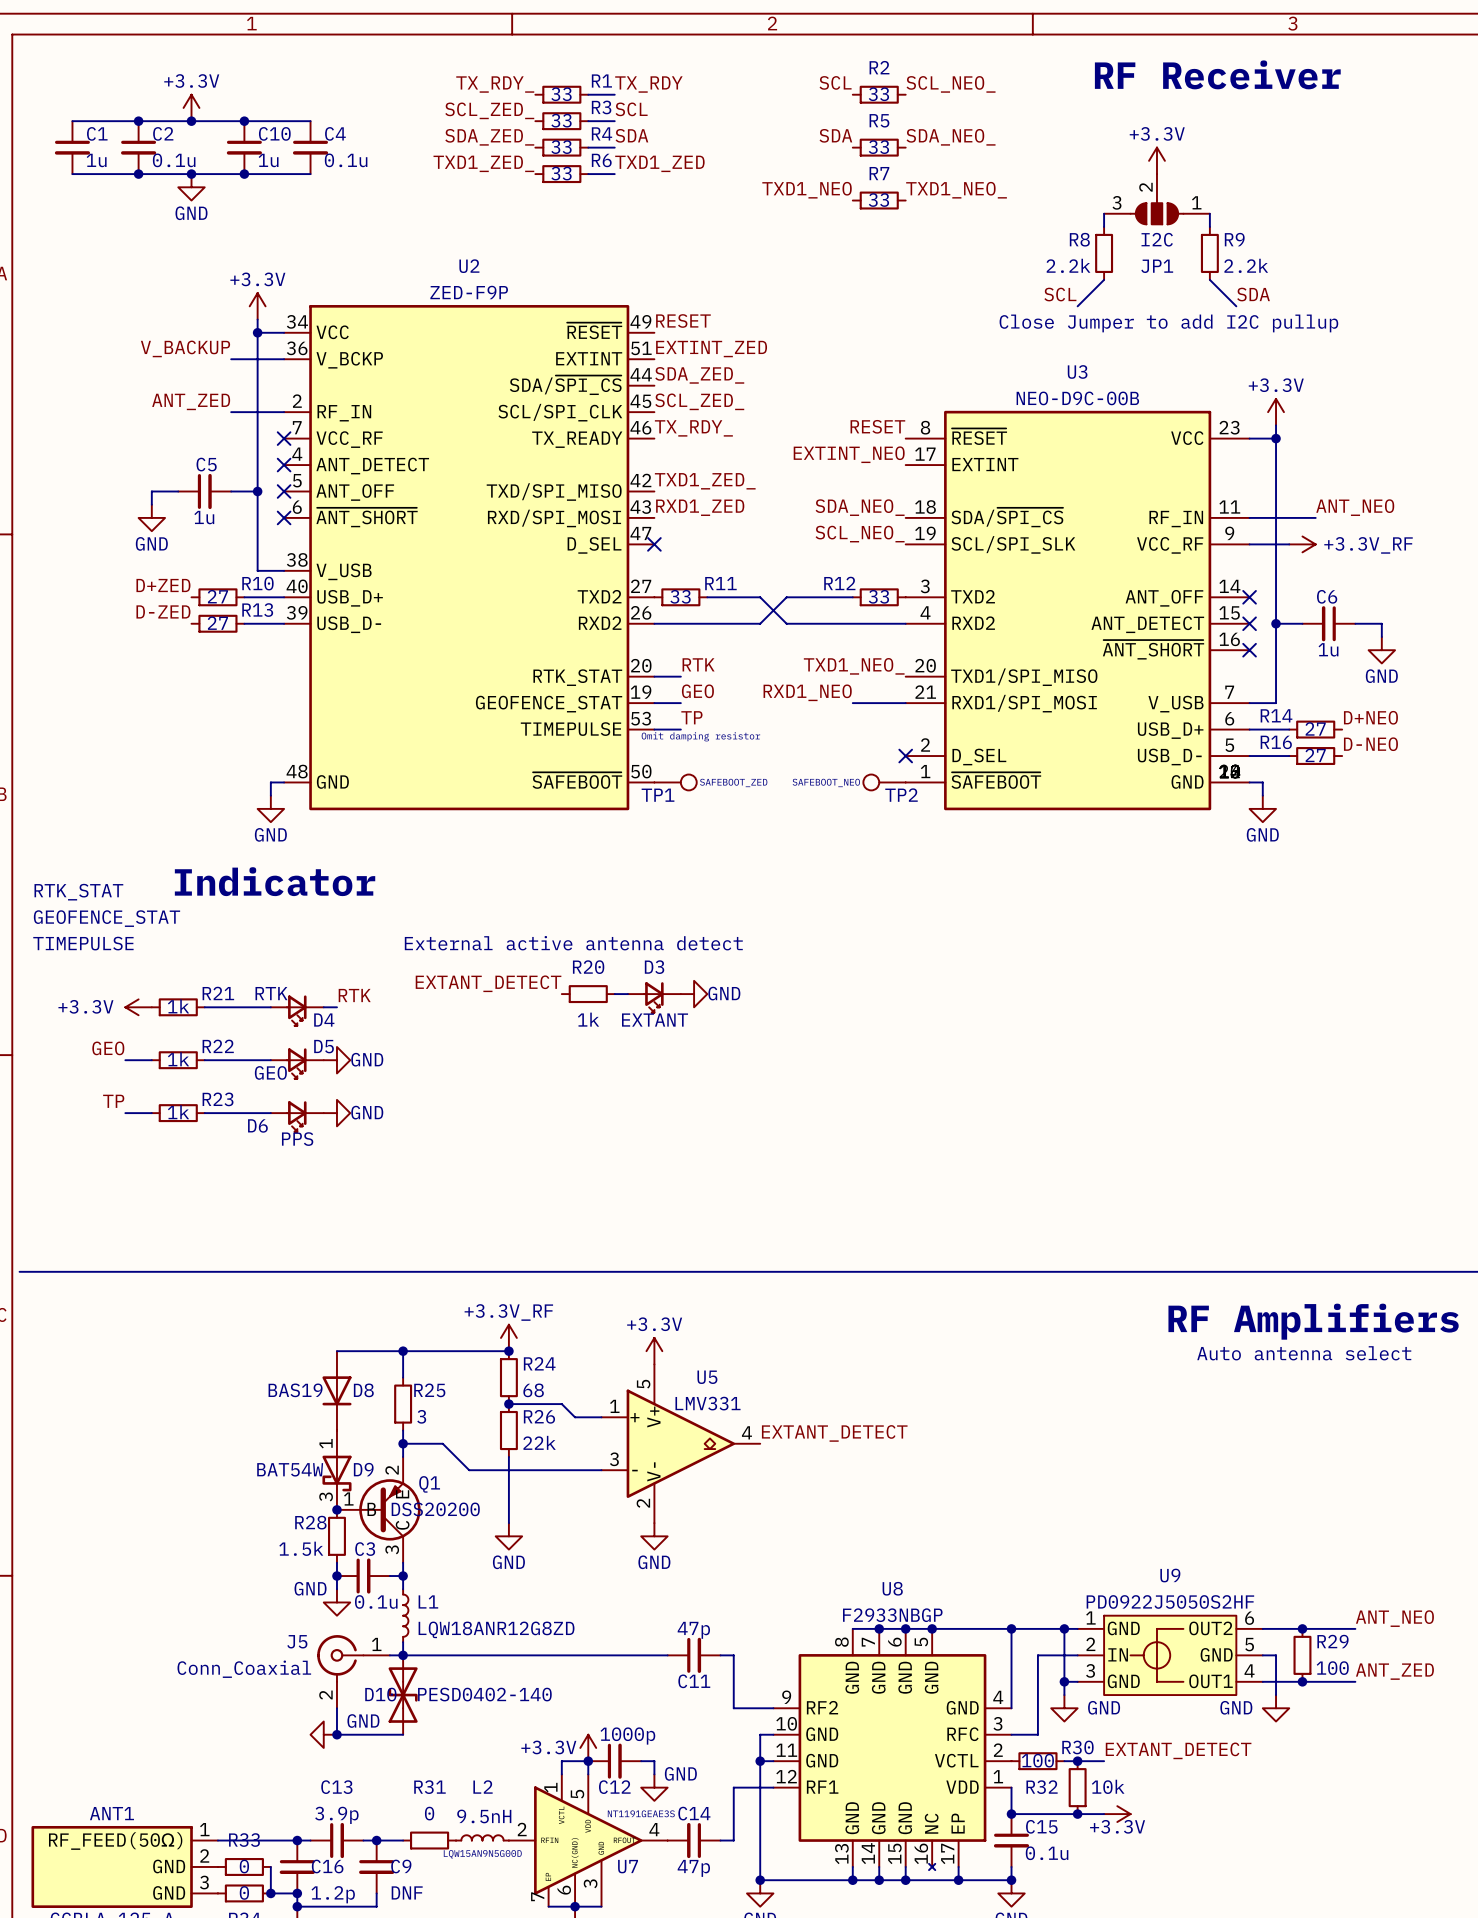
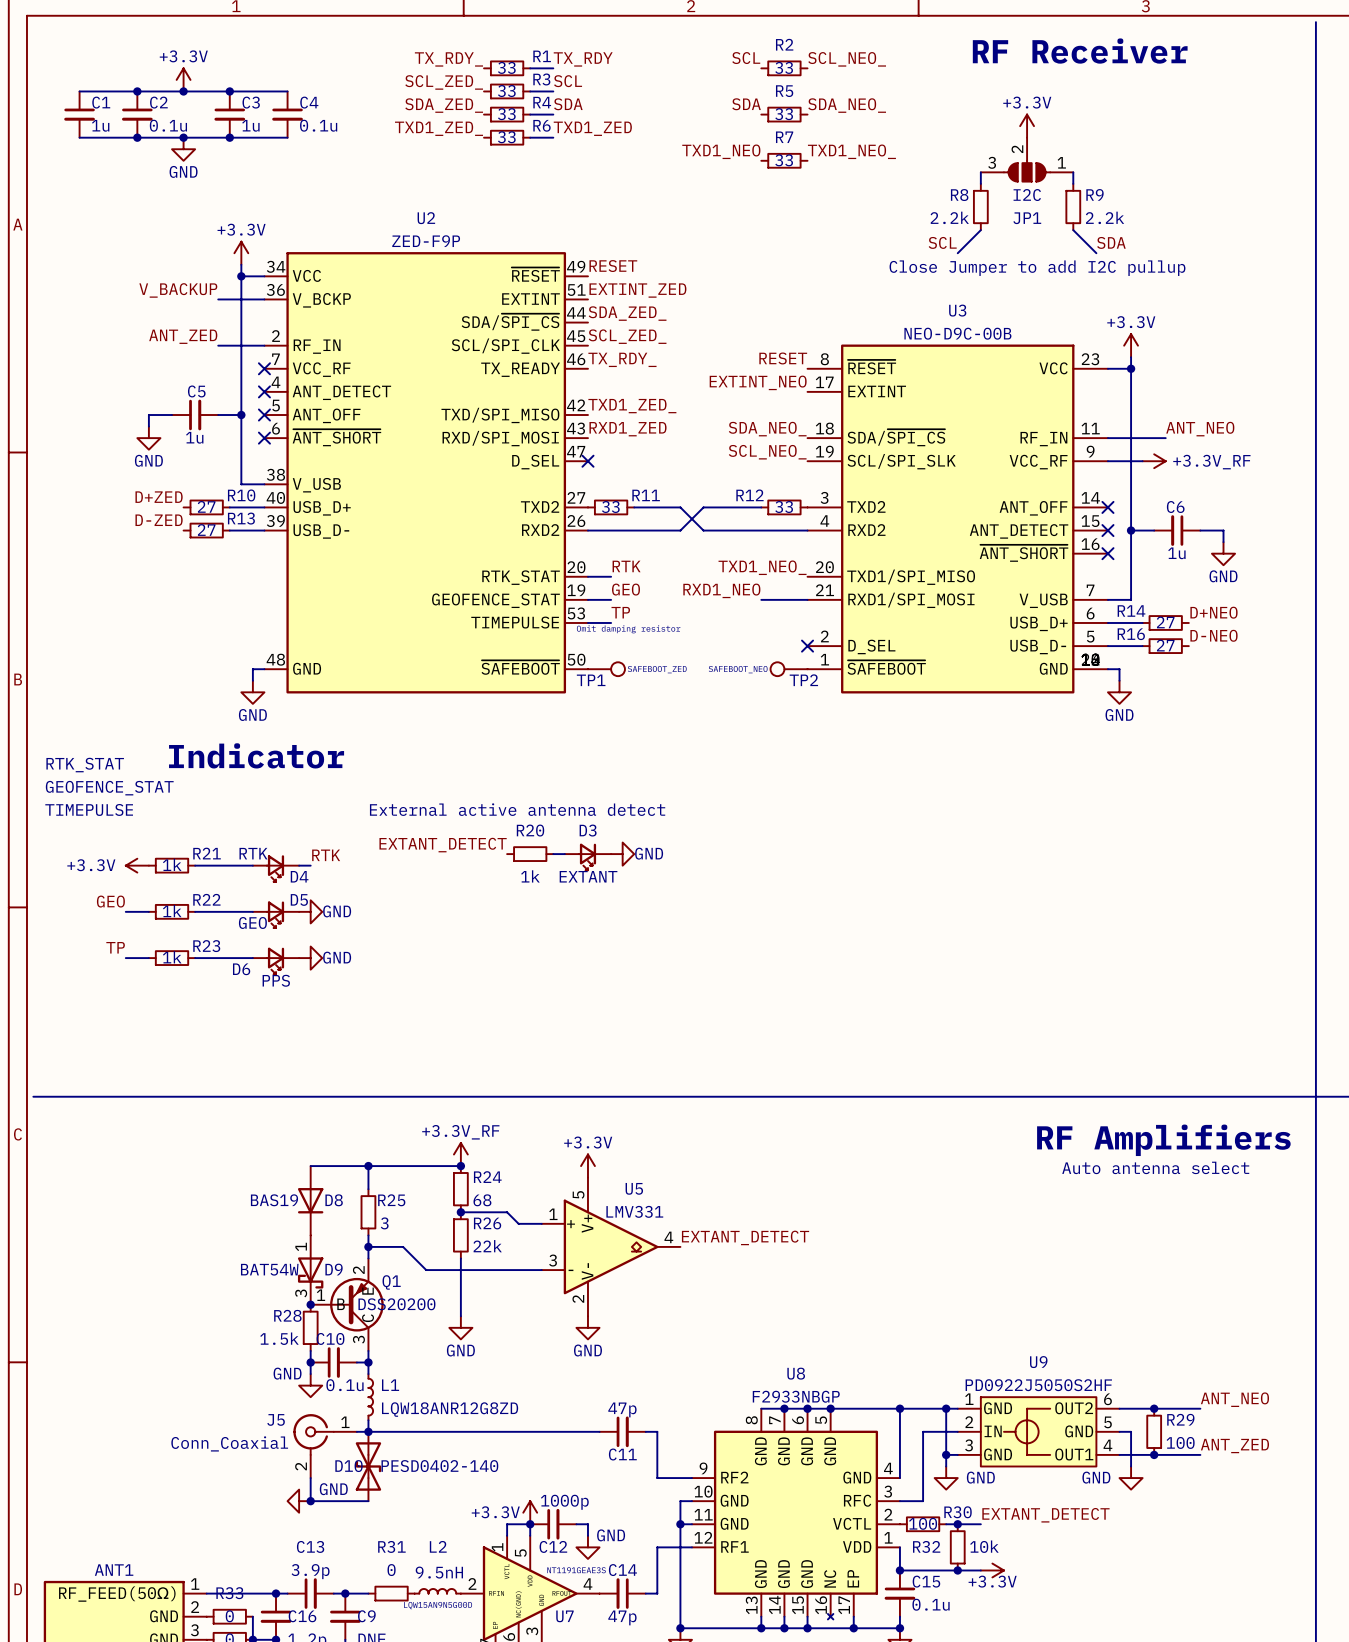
C10 name: C10 (274, 133) -> C3 (251, 102)
C3 name: C3 (365, 1549) -> C10 (330, 1338)

